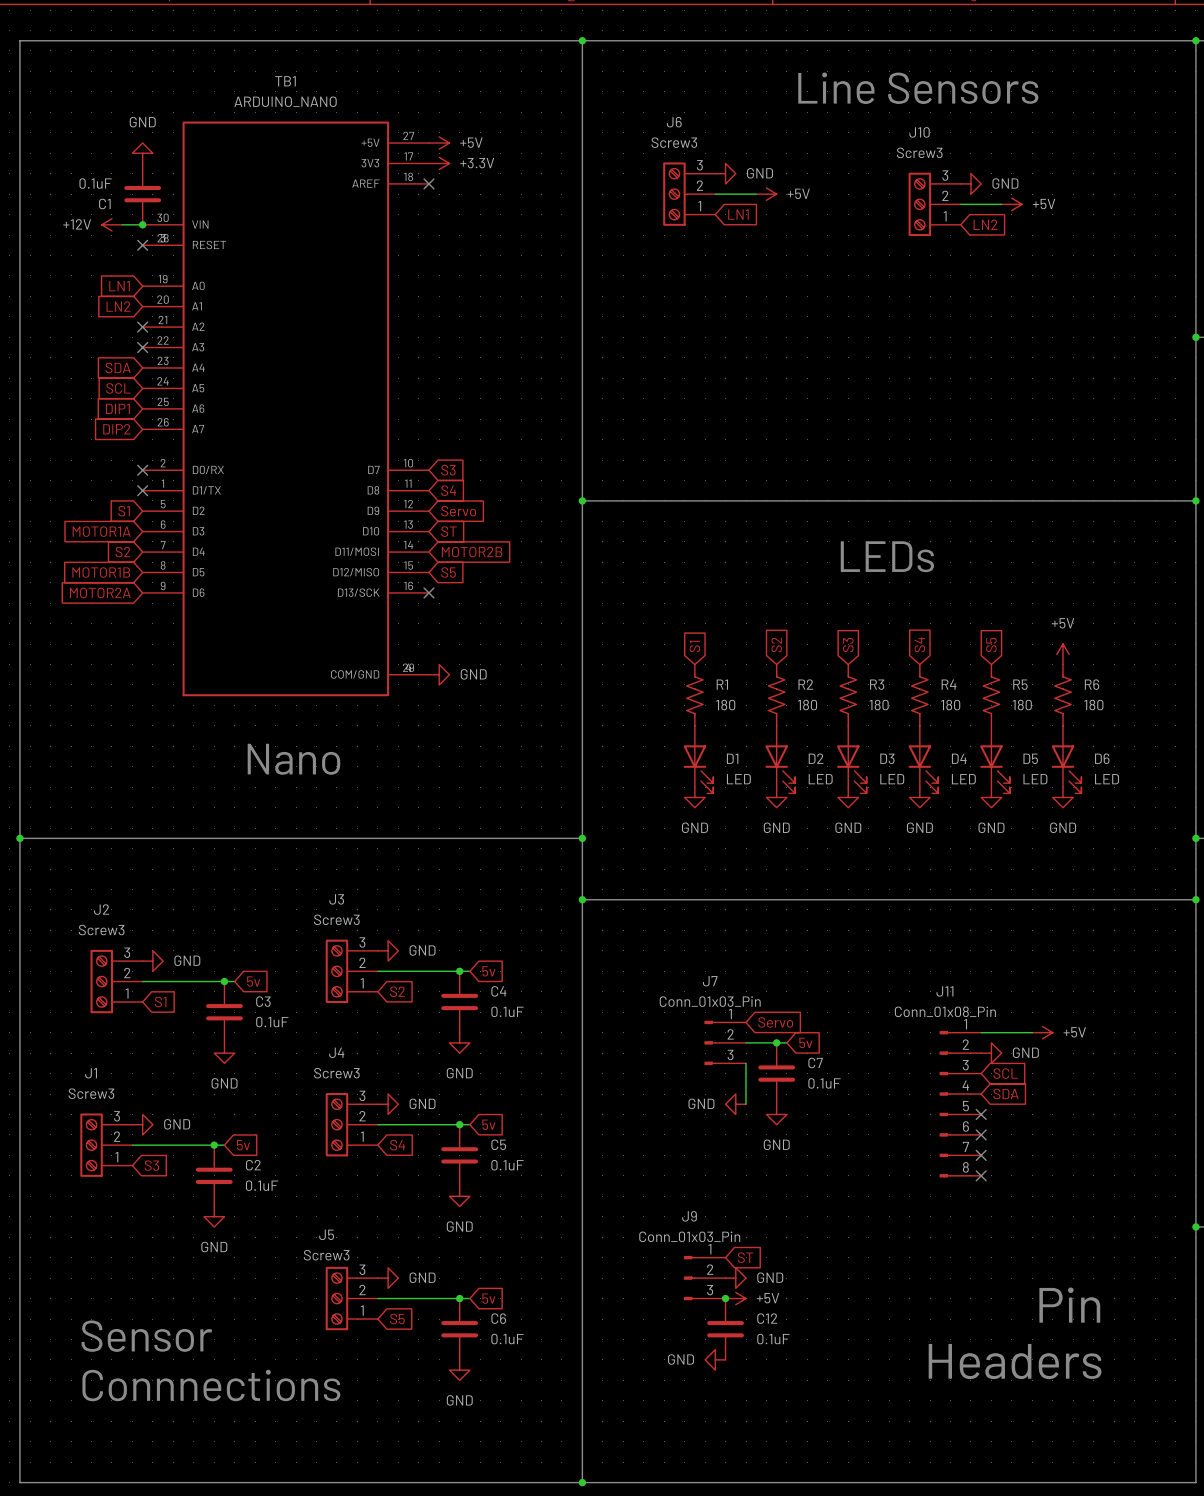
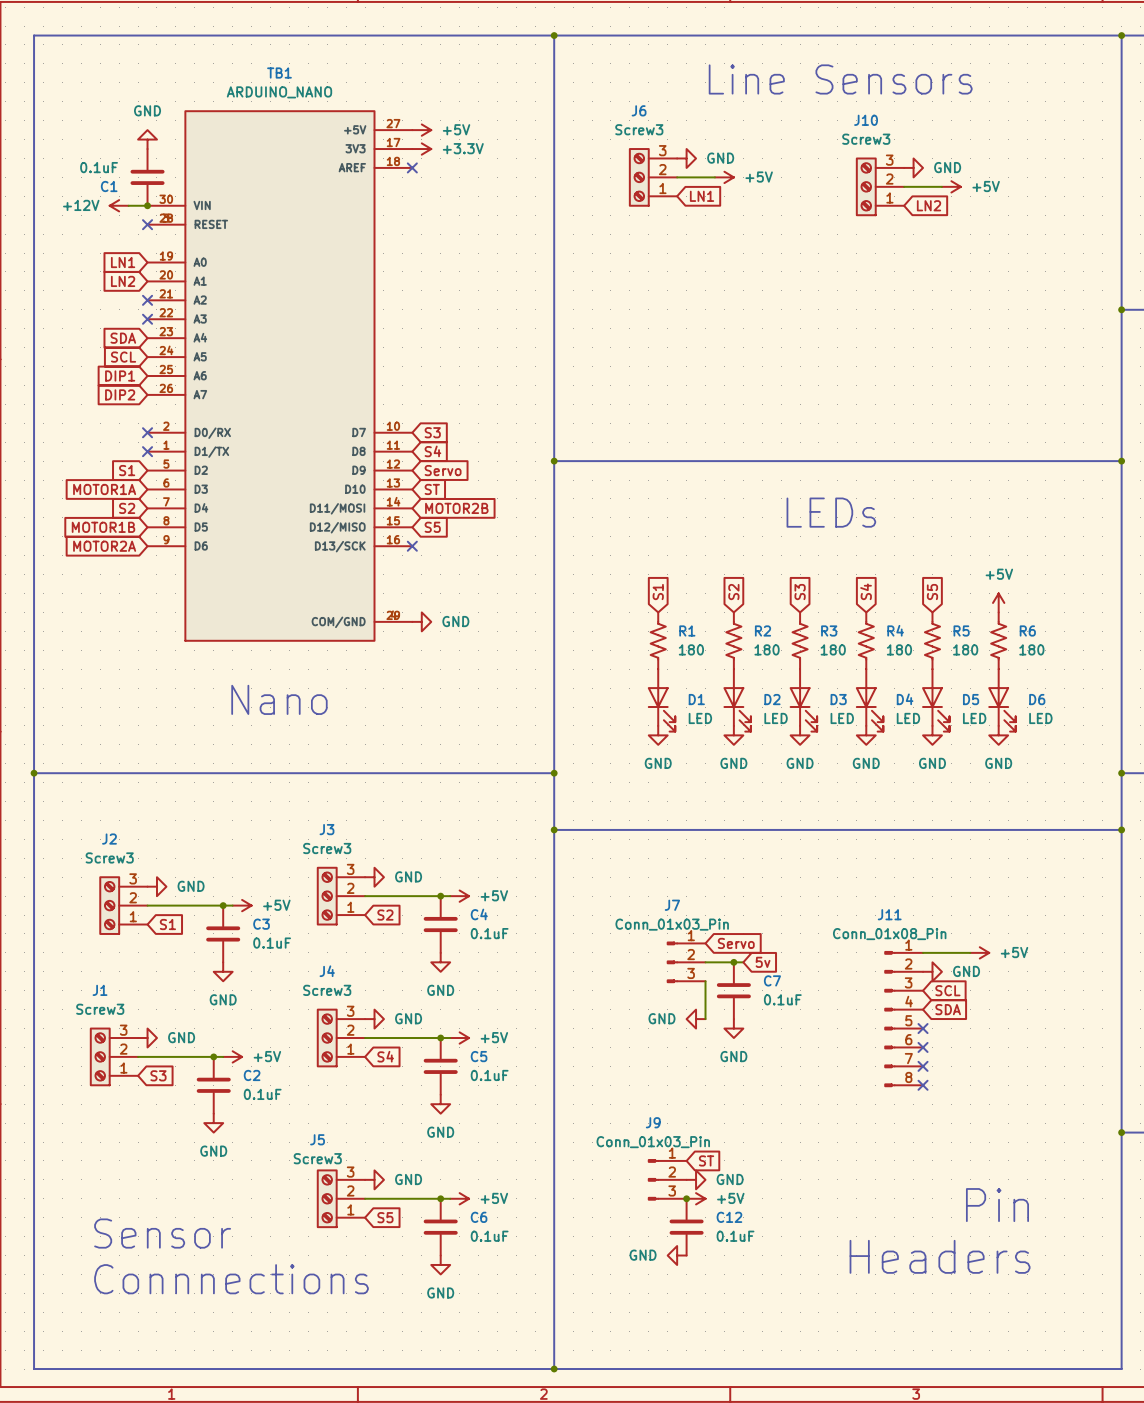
power symbol: none -> +5V (459, 896)
global label: 5v (488, 971) -> none
power symbol: none -> +5V (242, 905)
global label: 5v (253, 981) -> none
power symbol: none -> +5V (459, 1038)
global label: 5v (488, 1124) -> none
power symbol: none -> +5V (232, 1056)
global label: 5v (243, 1145) -> none
power symbol: none -> +5V (459, 1198)
global label: 5v (488, 1298) -> none

